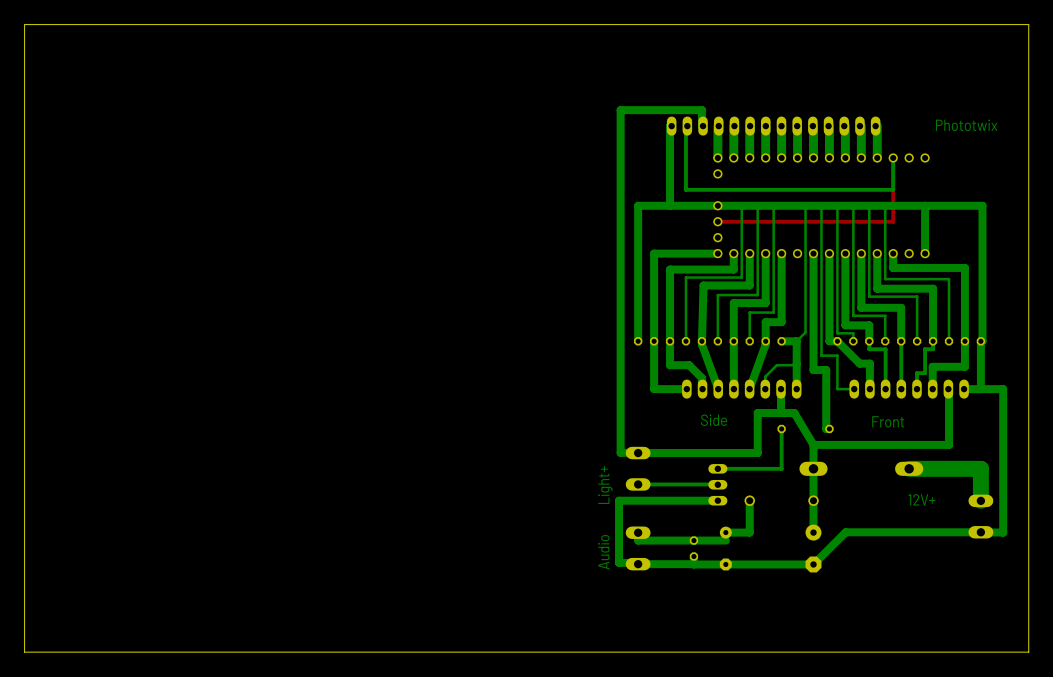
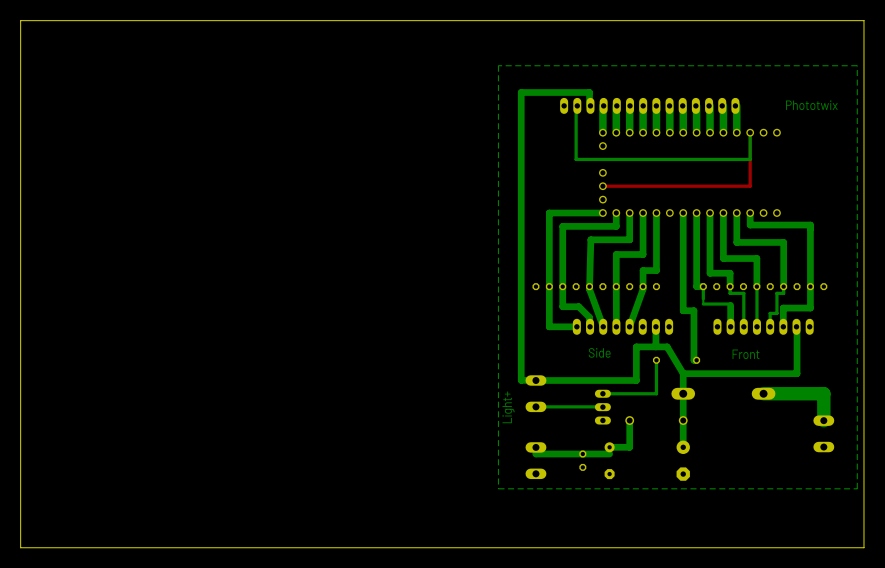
bottom zone outline: none -> (857, 65) (498, 65) (498, 488) (857, 488) (857, 65)
bottom track: (671, 126) (670, 126) (670, 205) -> none
bottom track: (741, 205) (741, 277) (685, 277) (685, 341) -> none
bottom track: (757, 205) (757, 295) (717, 295) (717, 341) -> none
bottom track: (773, 205) (773, 312) (749, 312) (749, 341) -> none
bottom track: (805, 205) (805, 332) (796, 341) -> none
bottom track: (821, 205) (821, 355) (837, 355) -> none
bottom track: (837, 205) (837, 333) (853, 333) (853, 341) -> none
bottom track: (853, 205) (853, 315) (885, 315) (885, 341) -> none
bottom track: (869, 205) (869, 296) (917, 296) (917, 341) -> none
bottom track: (885, 205) (885, 279) (949, 279) (949, 341) -> none
bottom track: (925, 205) (925, 253) -> none
bottom track: (638, 341) (638, 205) (982, 205) (980, 389) -> none
bottom track: (796, 341) (781, 341) -> none
bottom track: (796, 341) (796, 389) -> none
bottom track: (837, 341) (859, 363) (869, 363) -> (703, 286) (703, 298)
bottom track: (837, 362) (837, 389) (854, 389) -> (703, 304) (730, 304)
bottom track: (796, 363) (776, 365) (765, 376) (765, 389) -> none
bottom track: (964, 389) (1003, 389) (1003, 532) (845, 532) (813, 564) (693, 564) (693, 556) -> none
text: 12V+ (921, 499) -> none
bottom track: (717, 500) (619, 500) (619, 562) (693, 564) -> none
text: Audio (603, 552) -> none

